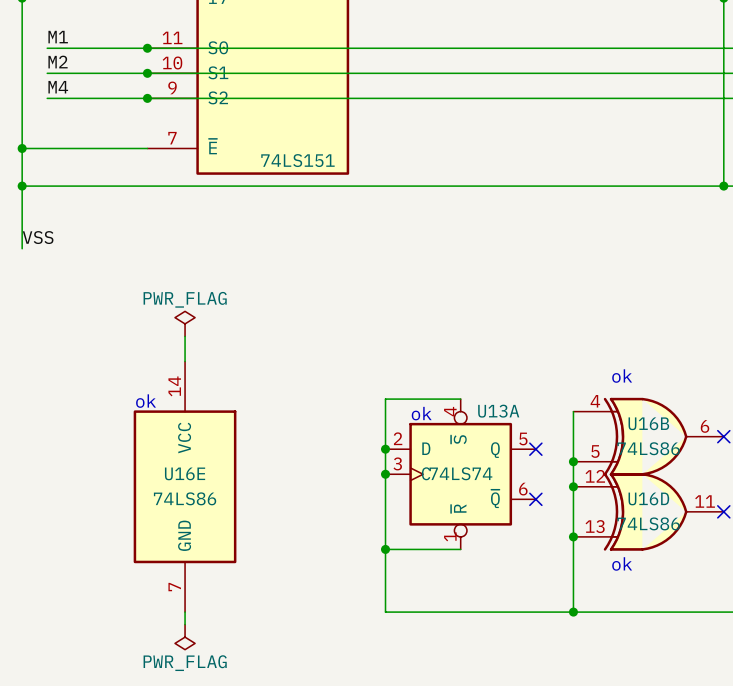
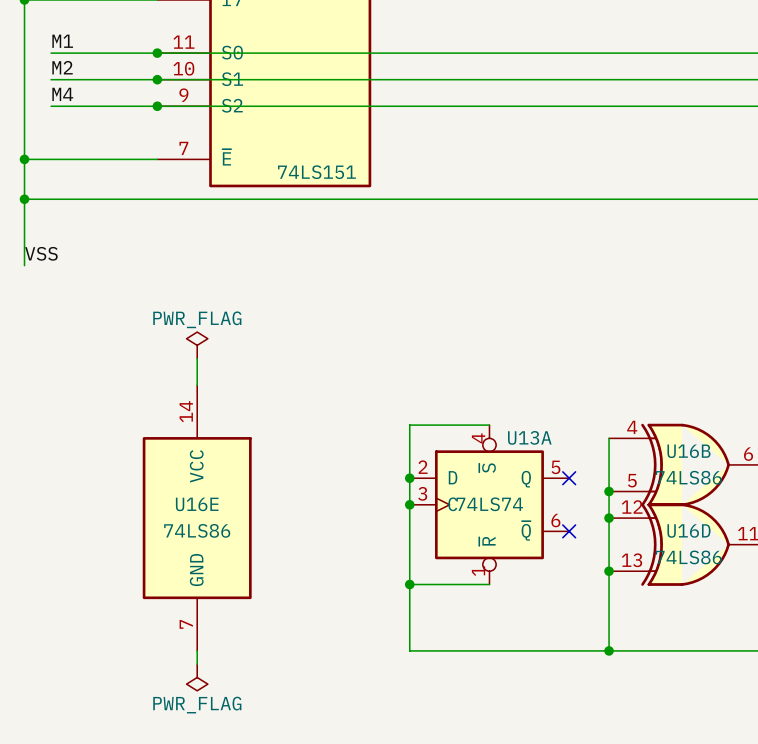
text: ok (622, 376) -> none
text: ok (146, 401) -> none
text: ok (421, 413) -> none
text: ok (622, 563) -> none

